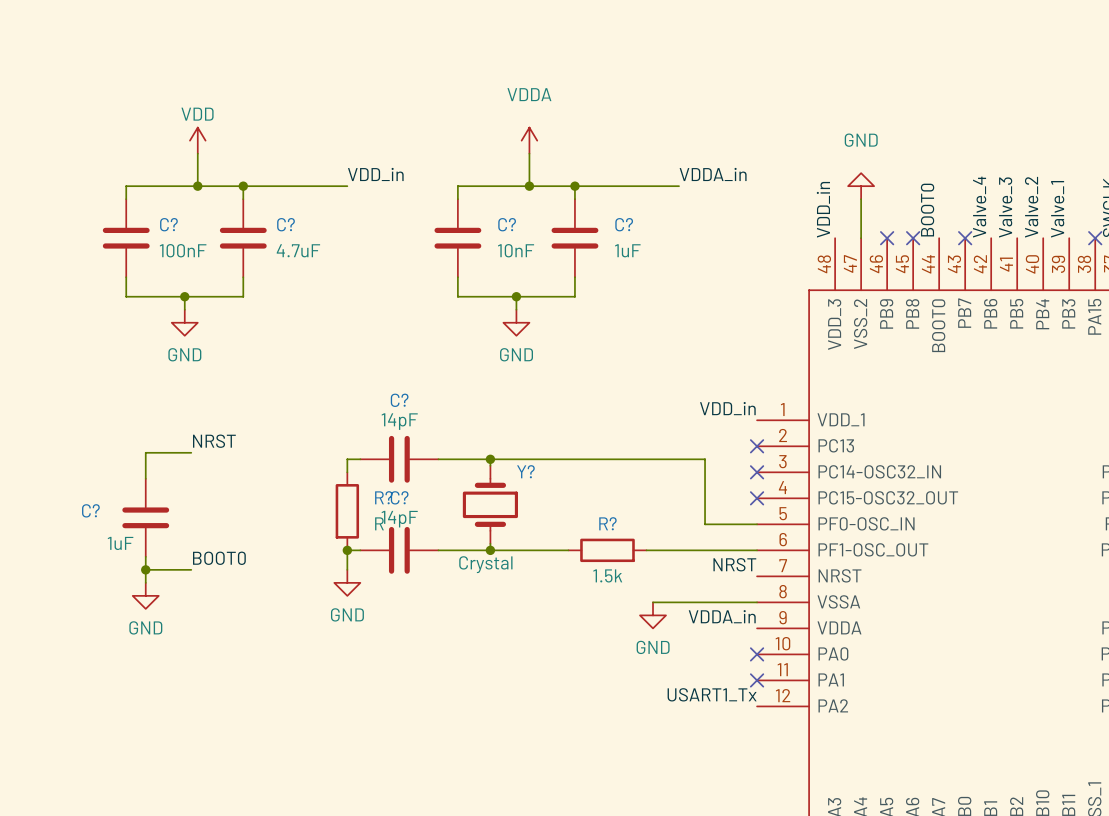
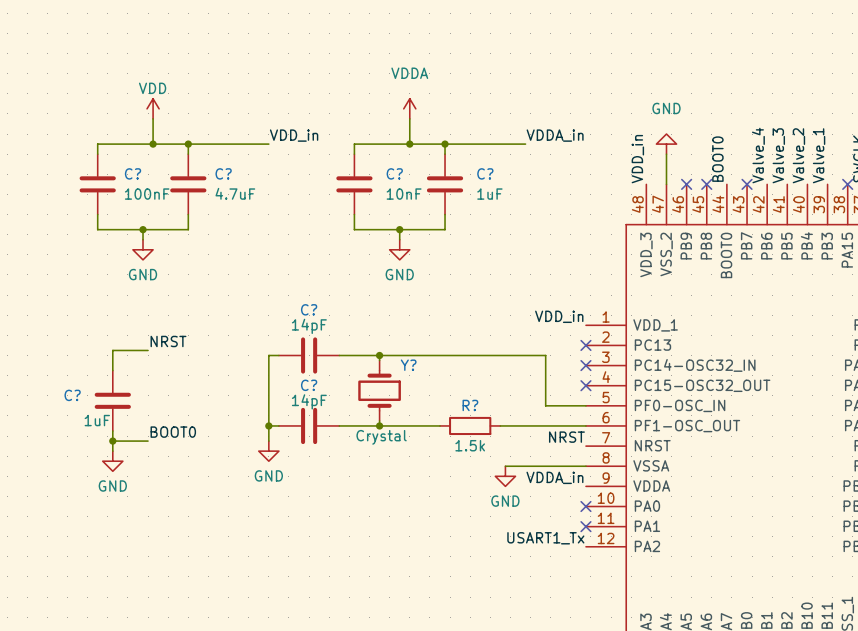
wire: none -> (268, 365) (268, 425)
R?: R (347, 511) -> none

